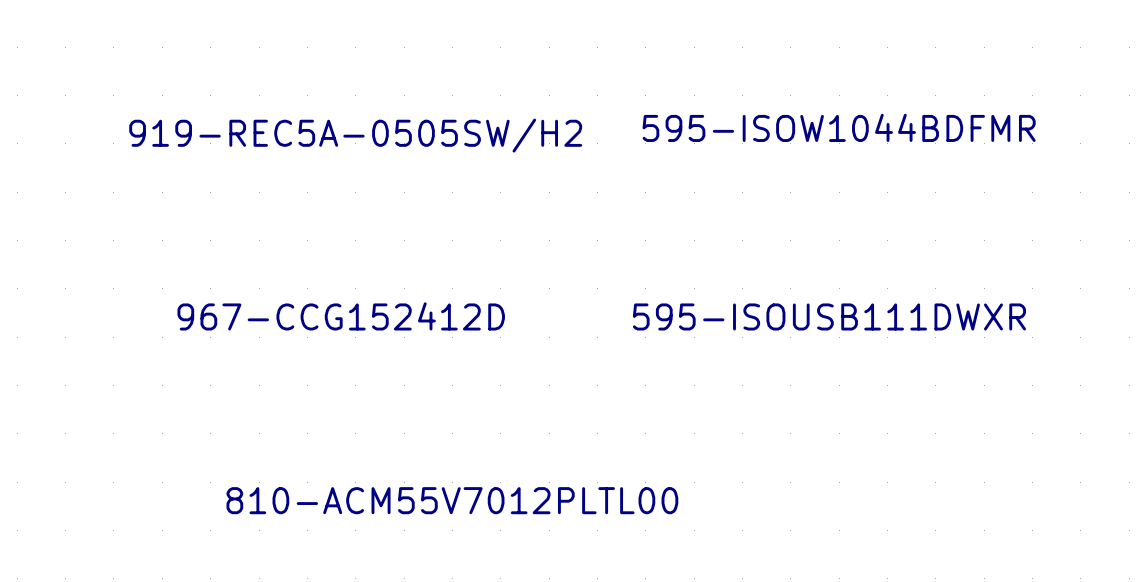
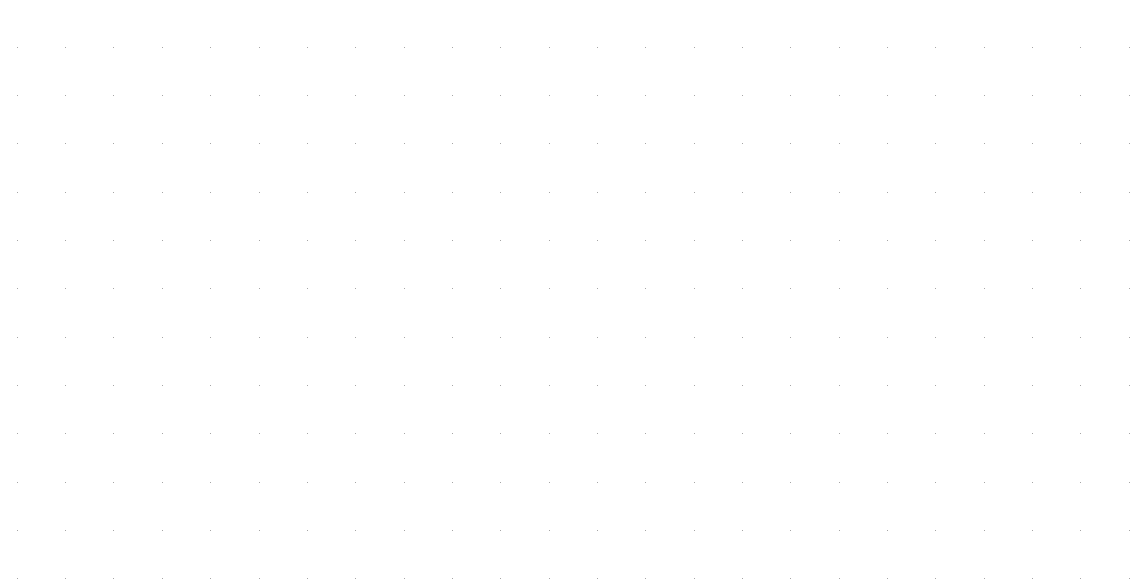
text: 595-ISOW1044BDFMR (839, 127) -> none
text: 919-REC5A-0505SW/H2 (355, 135) -> none
text: 967-CCG152412D (341, 316) -> none
text: 595-ISOUSB111DWXR (829, 316) -> none
text: 810-ACM55V7012PLTL00 (452, 500) -> none

